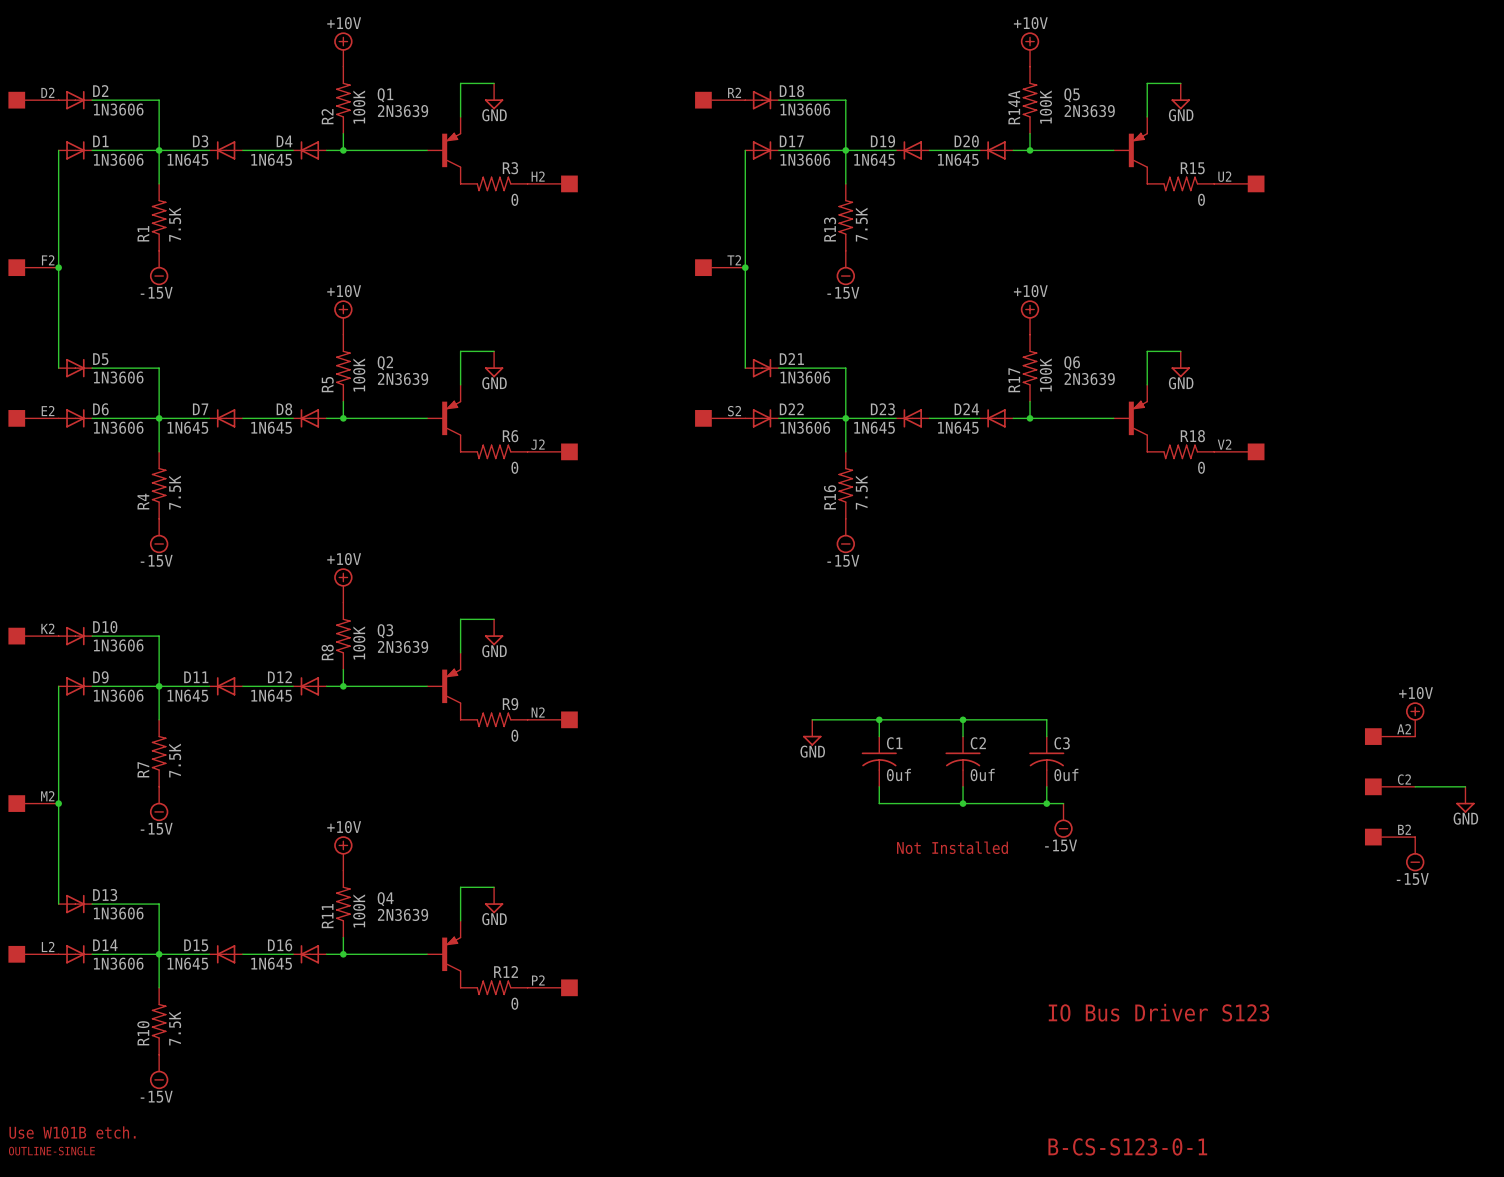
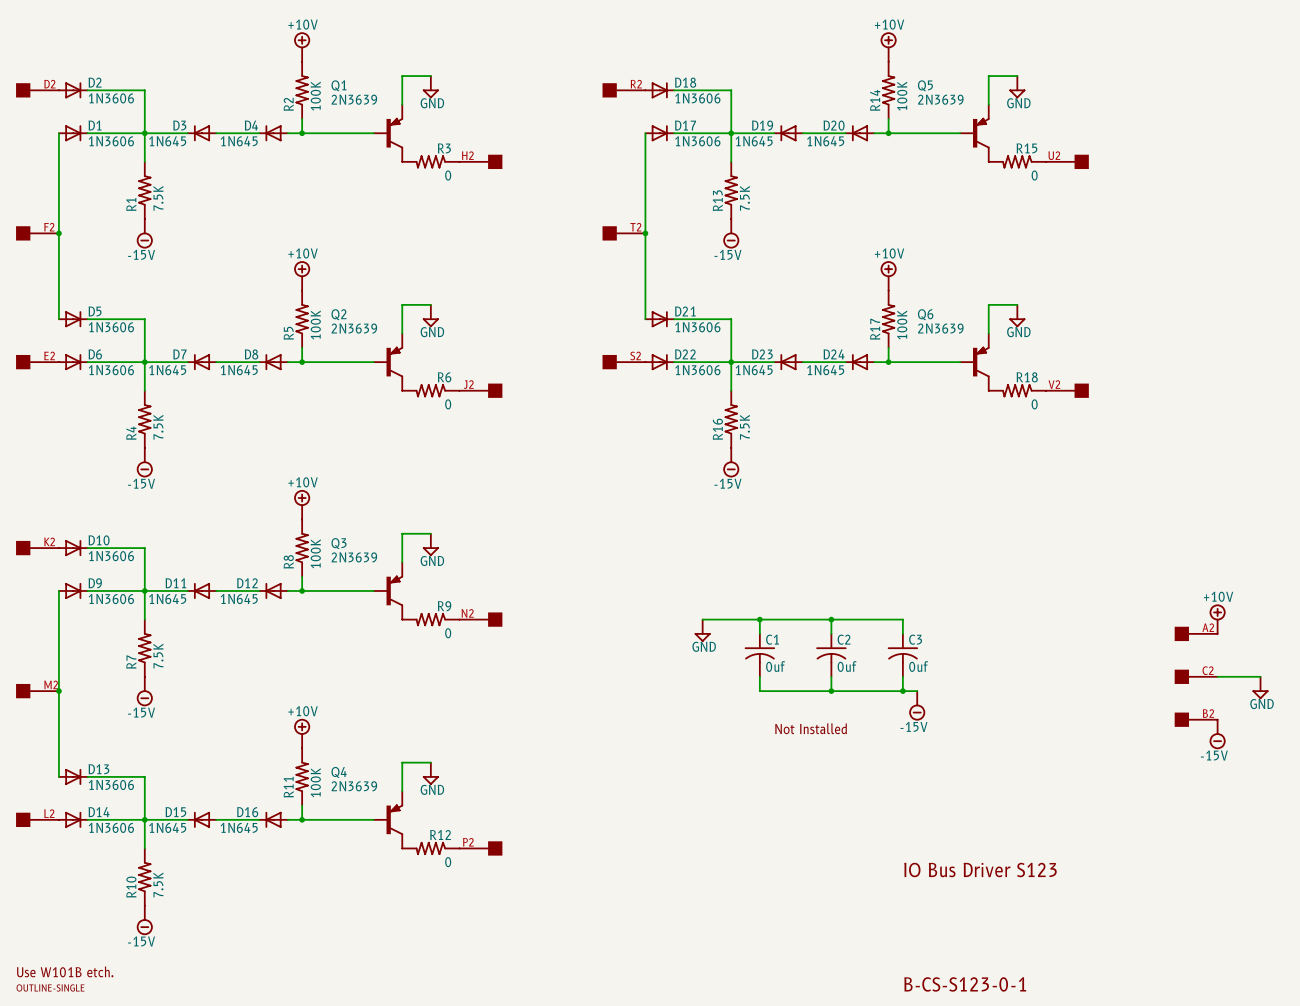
R14A name: R14A (1014, 107) -> R14 (875, 100)

